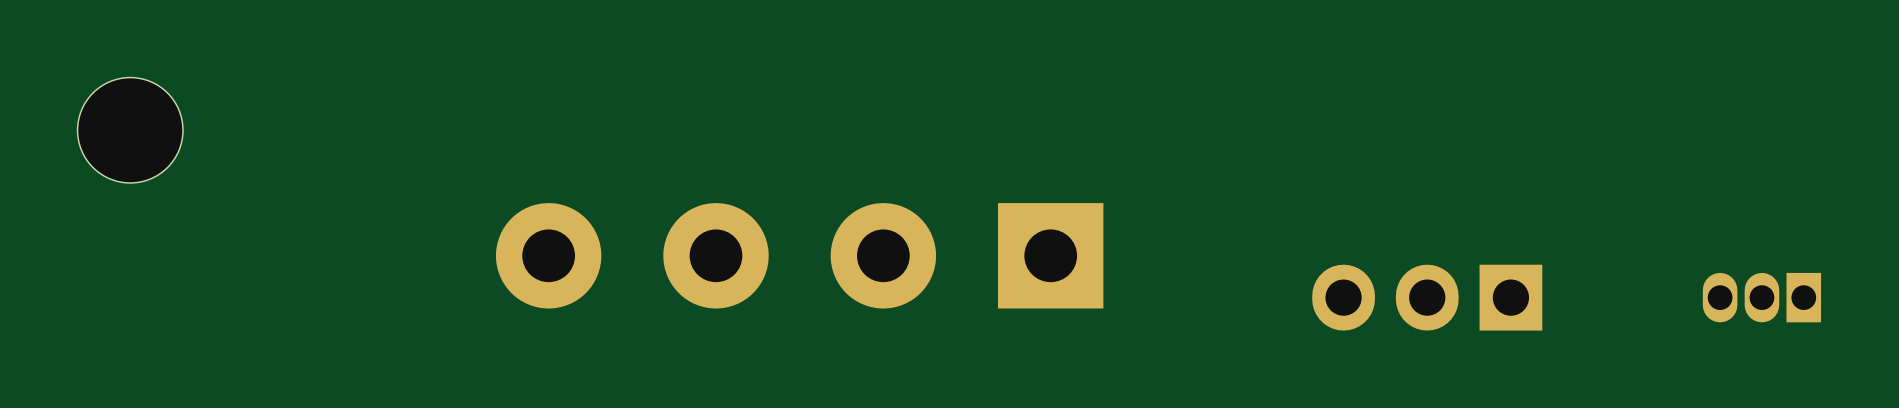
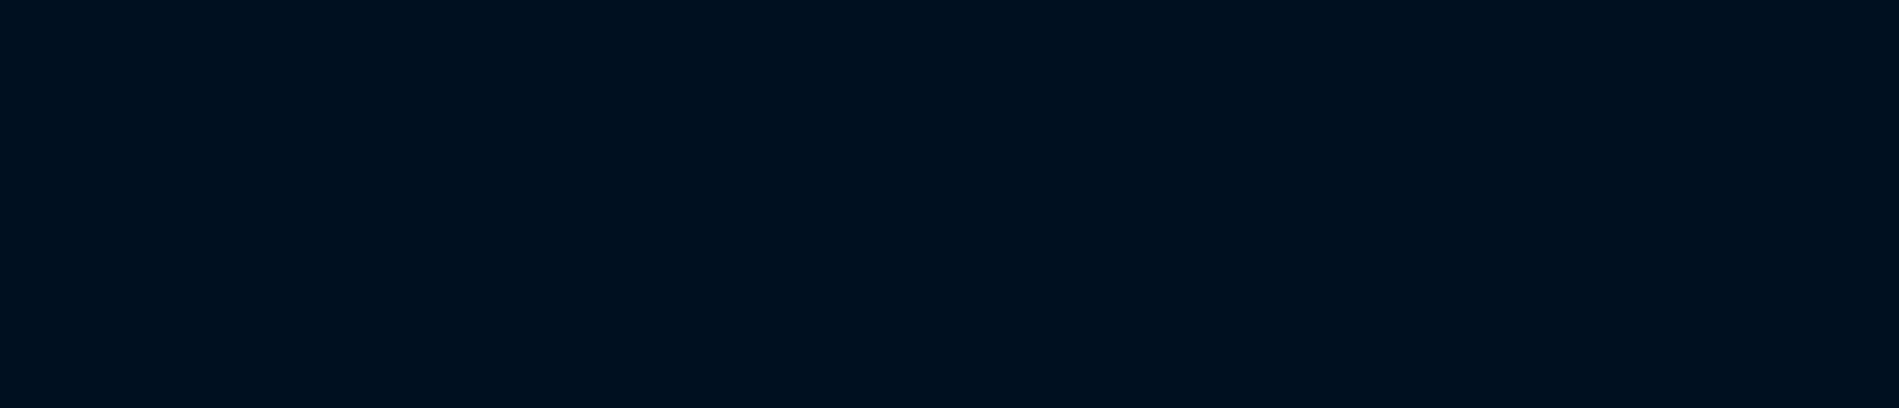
part: (130, 130) -> none
part: (799, 255) -> none
part: (1427, 297) -> none
part: (1761, 297) -> none

